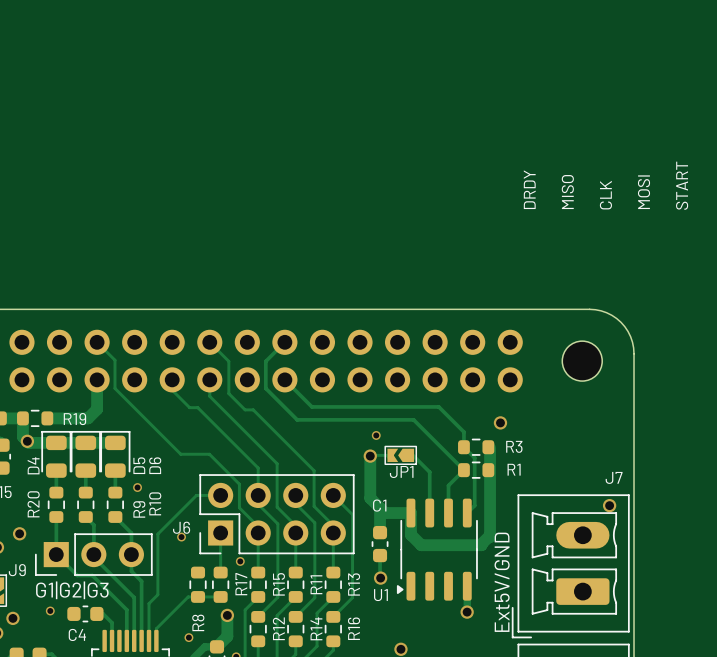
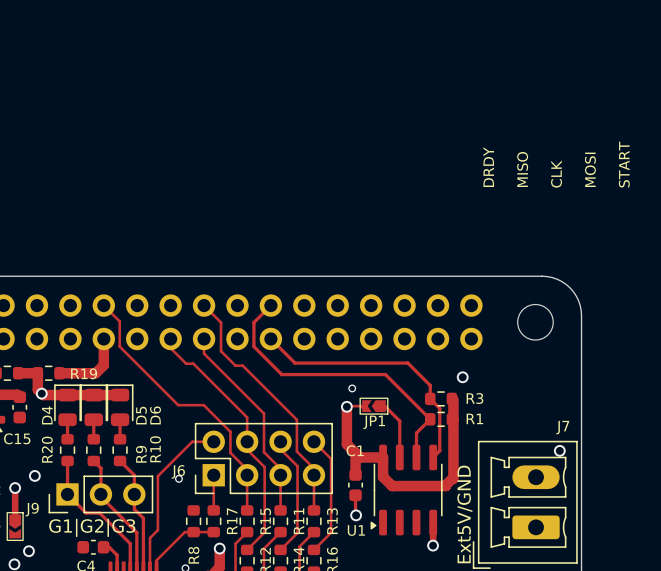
via: (137, 487) -> none
via: (240, 561) -> none
via: (50, 610) -> none

